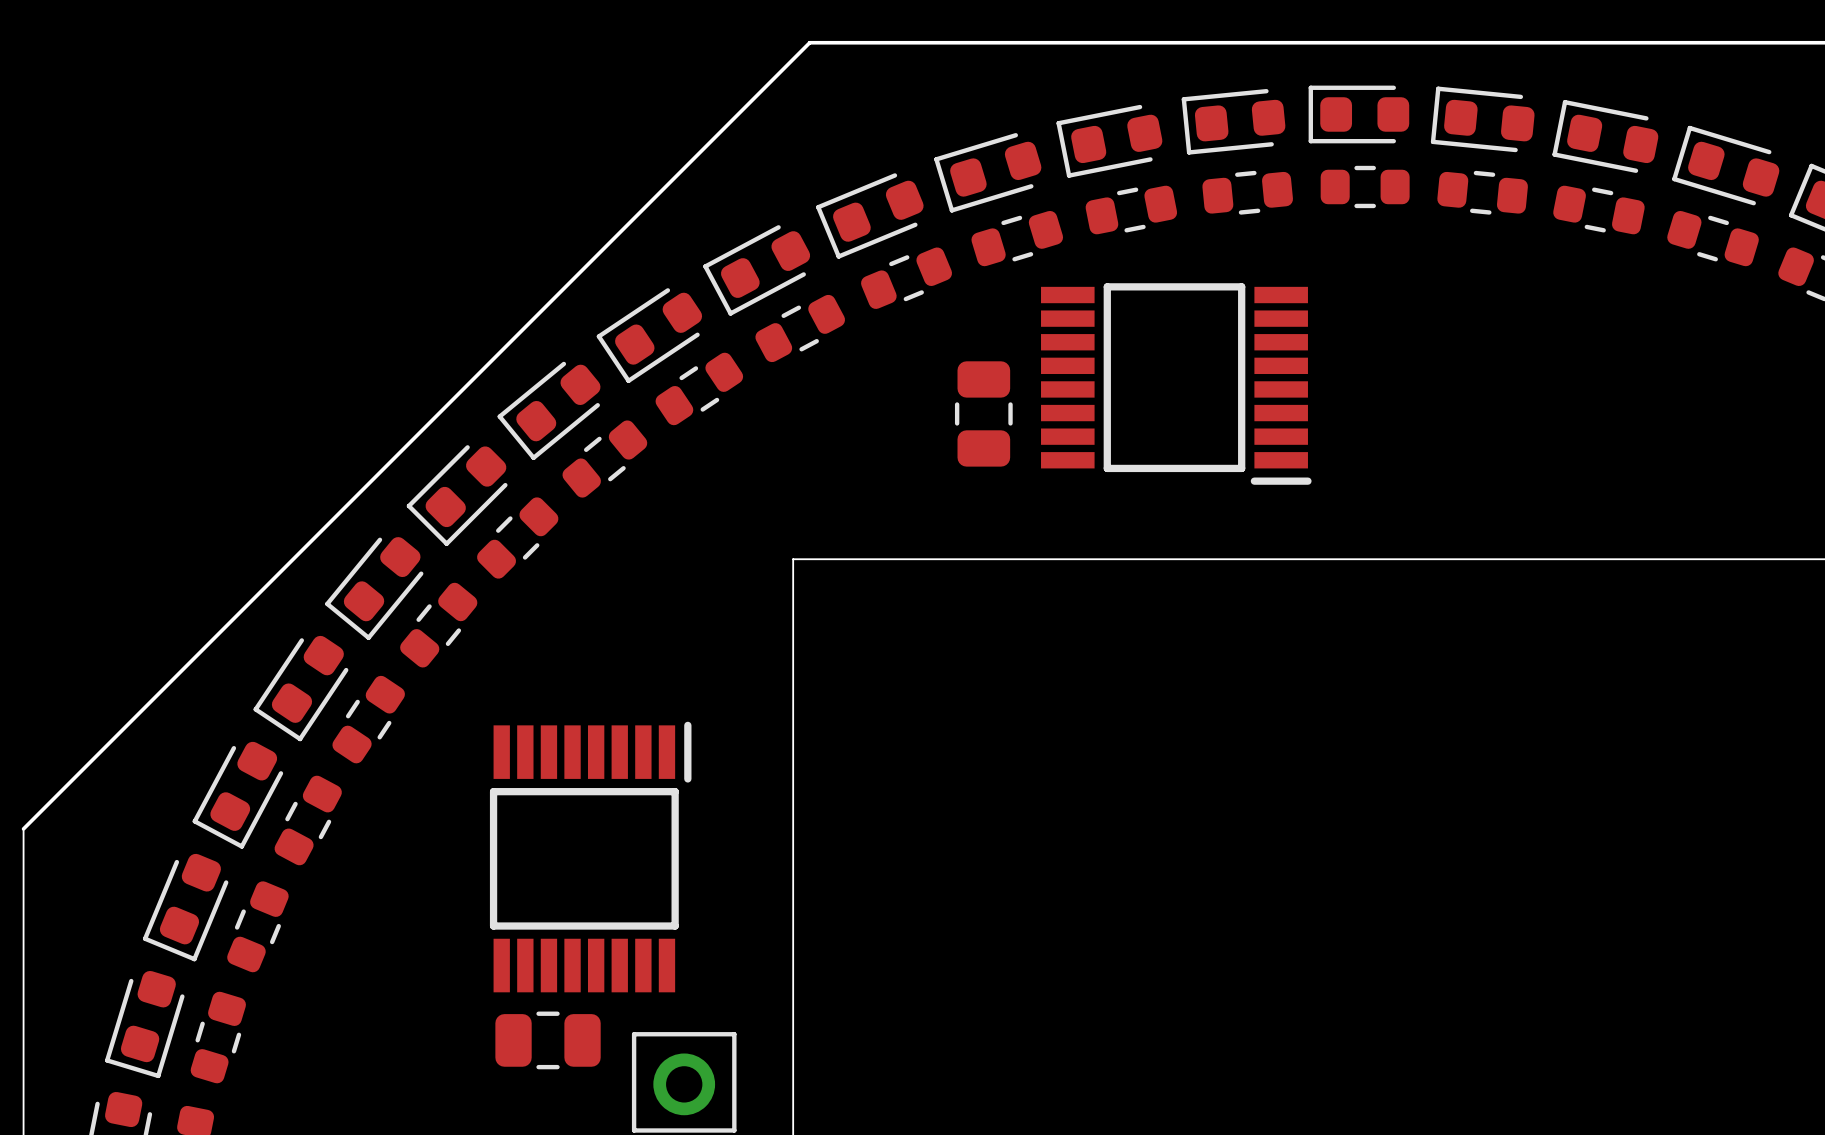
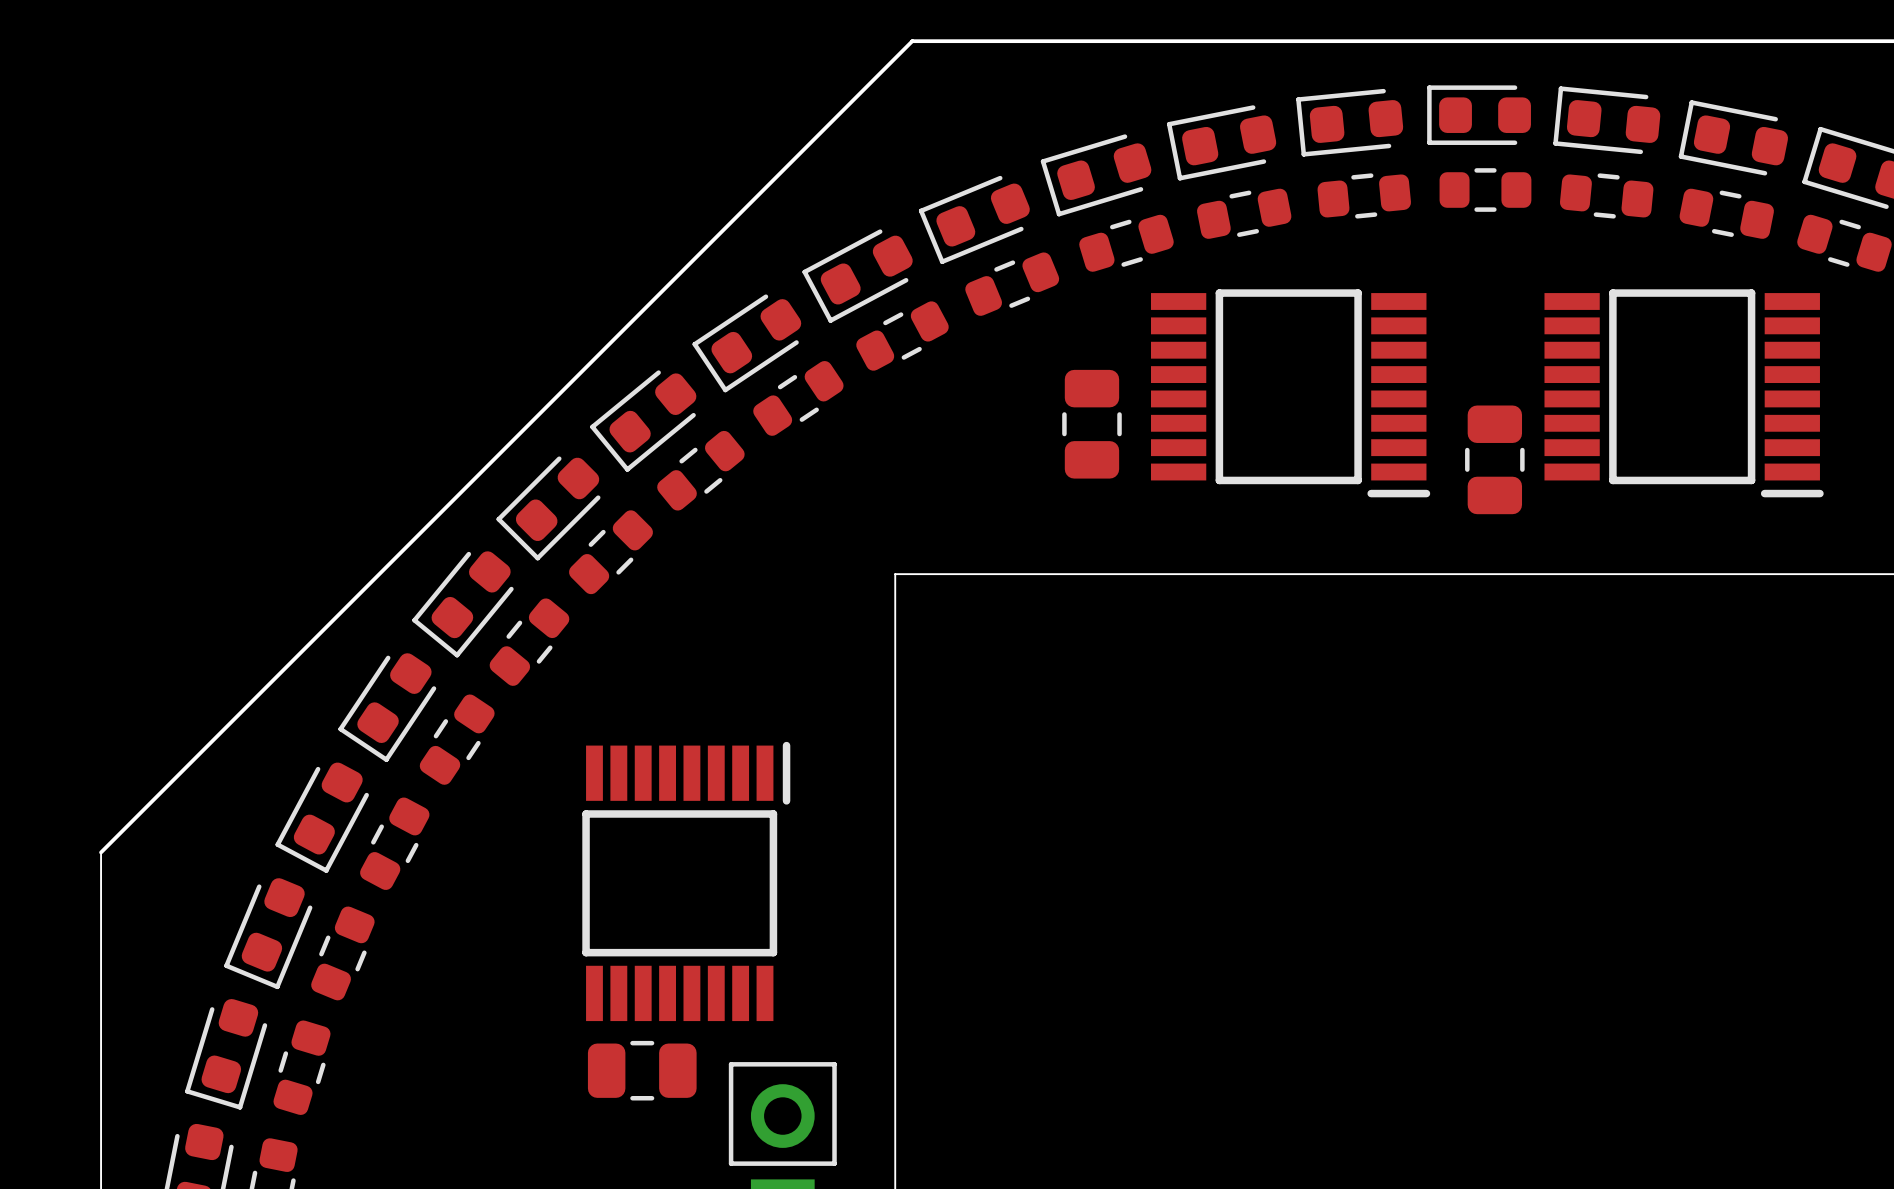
part: none -> (1684, 393)
part: none -> (1494, 459)

